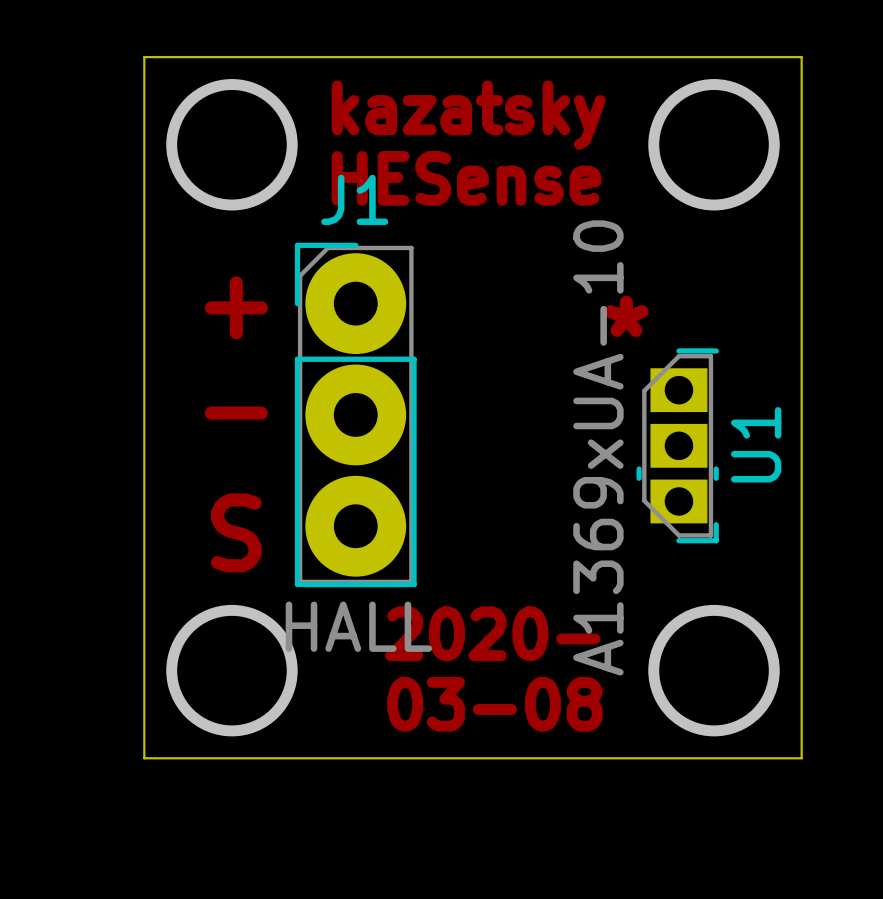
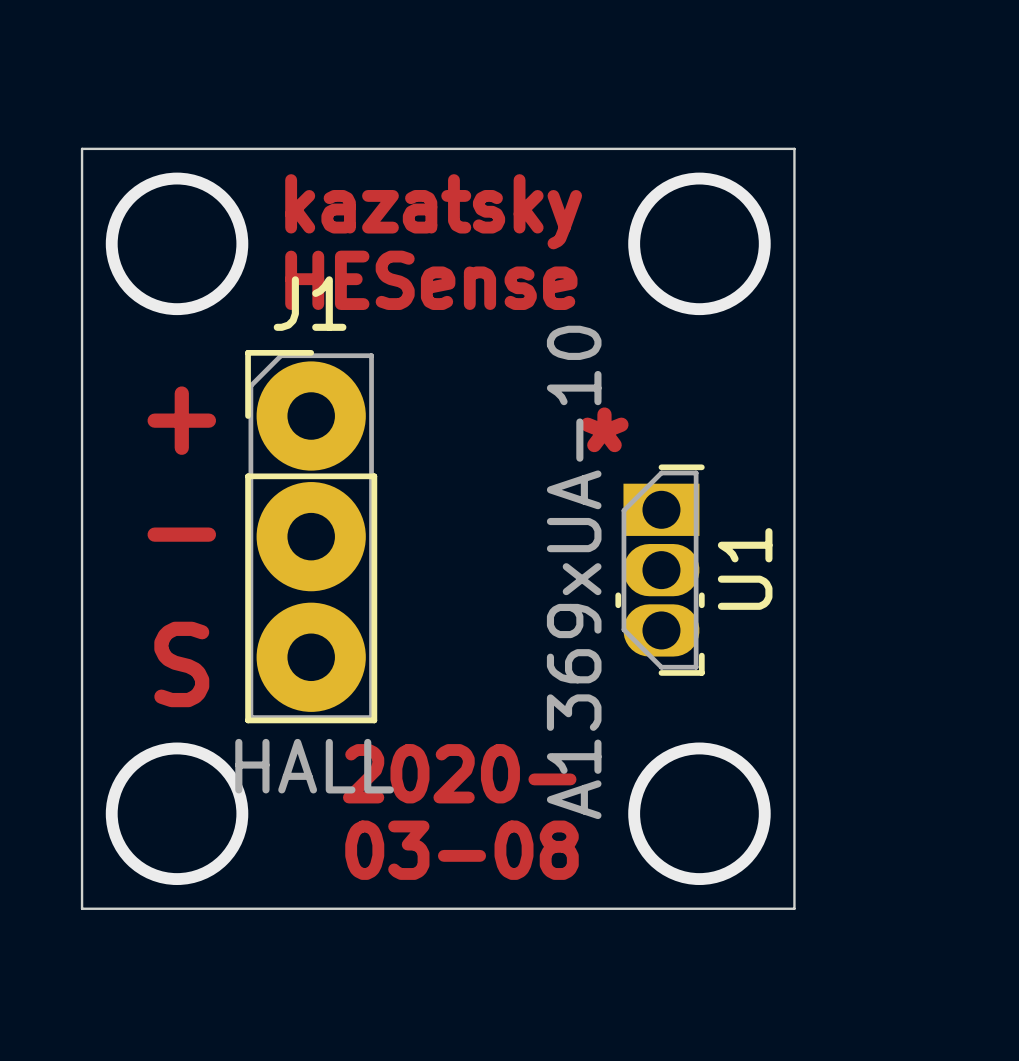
U1 footprint: [636, 348, 719, 544] -> [615, 464, 705, 676]

